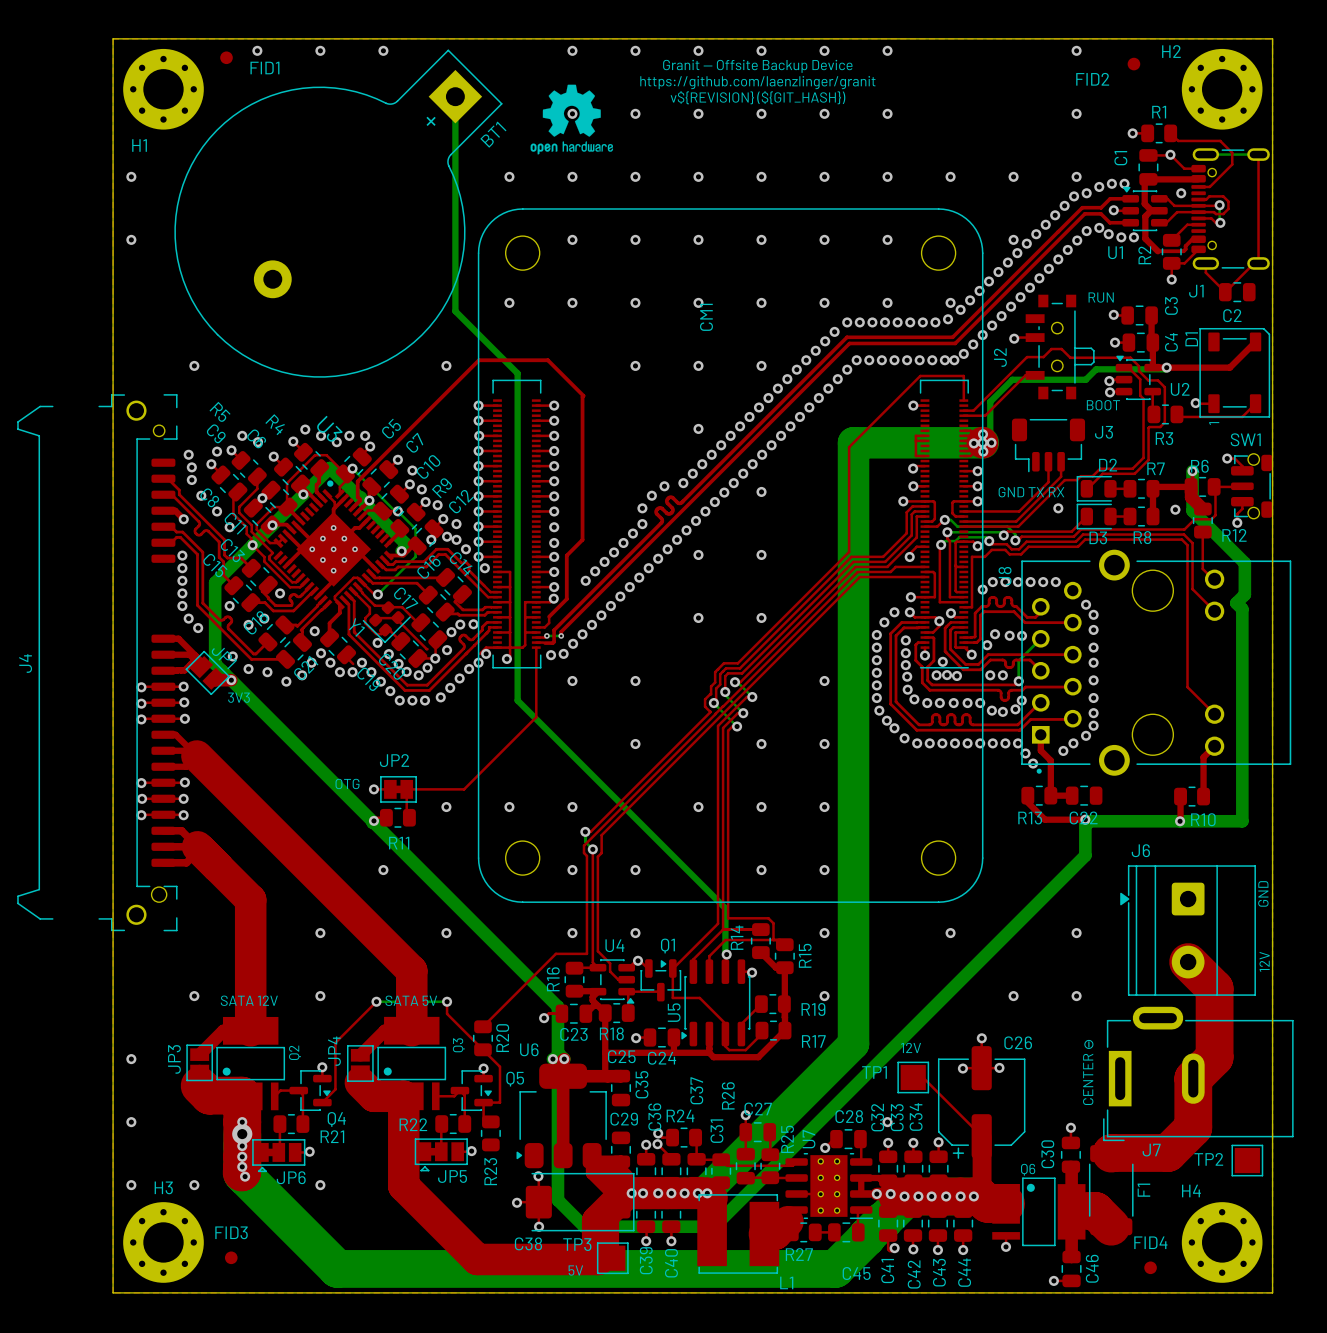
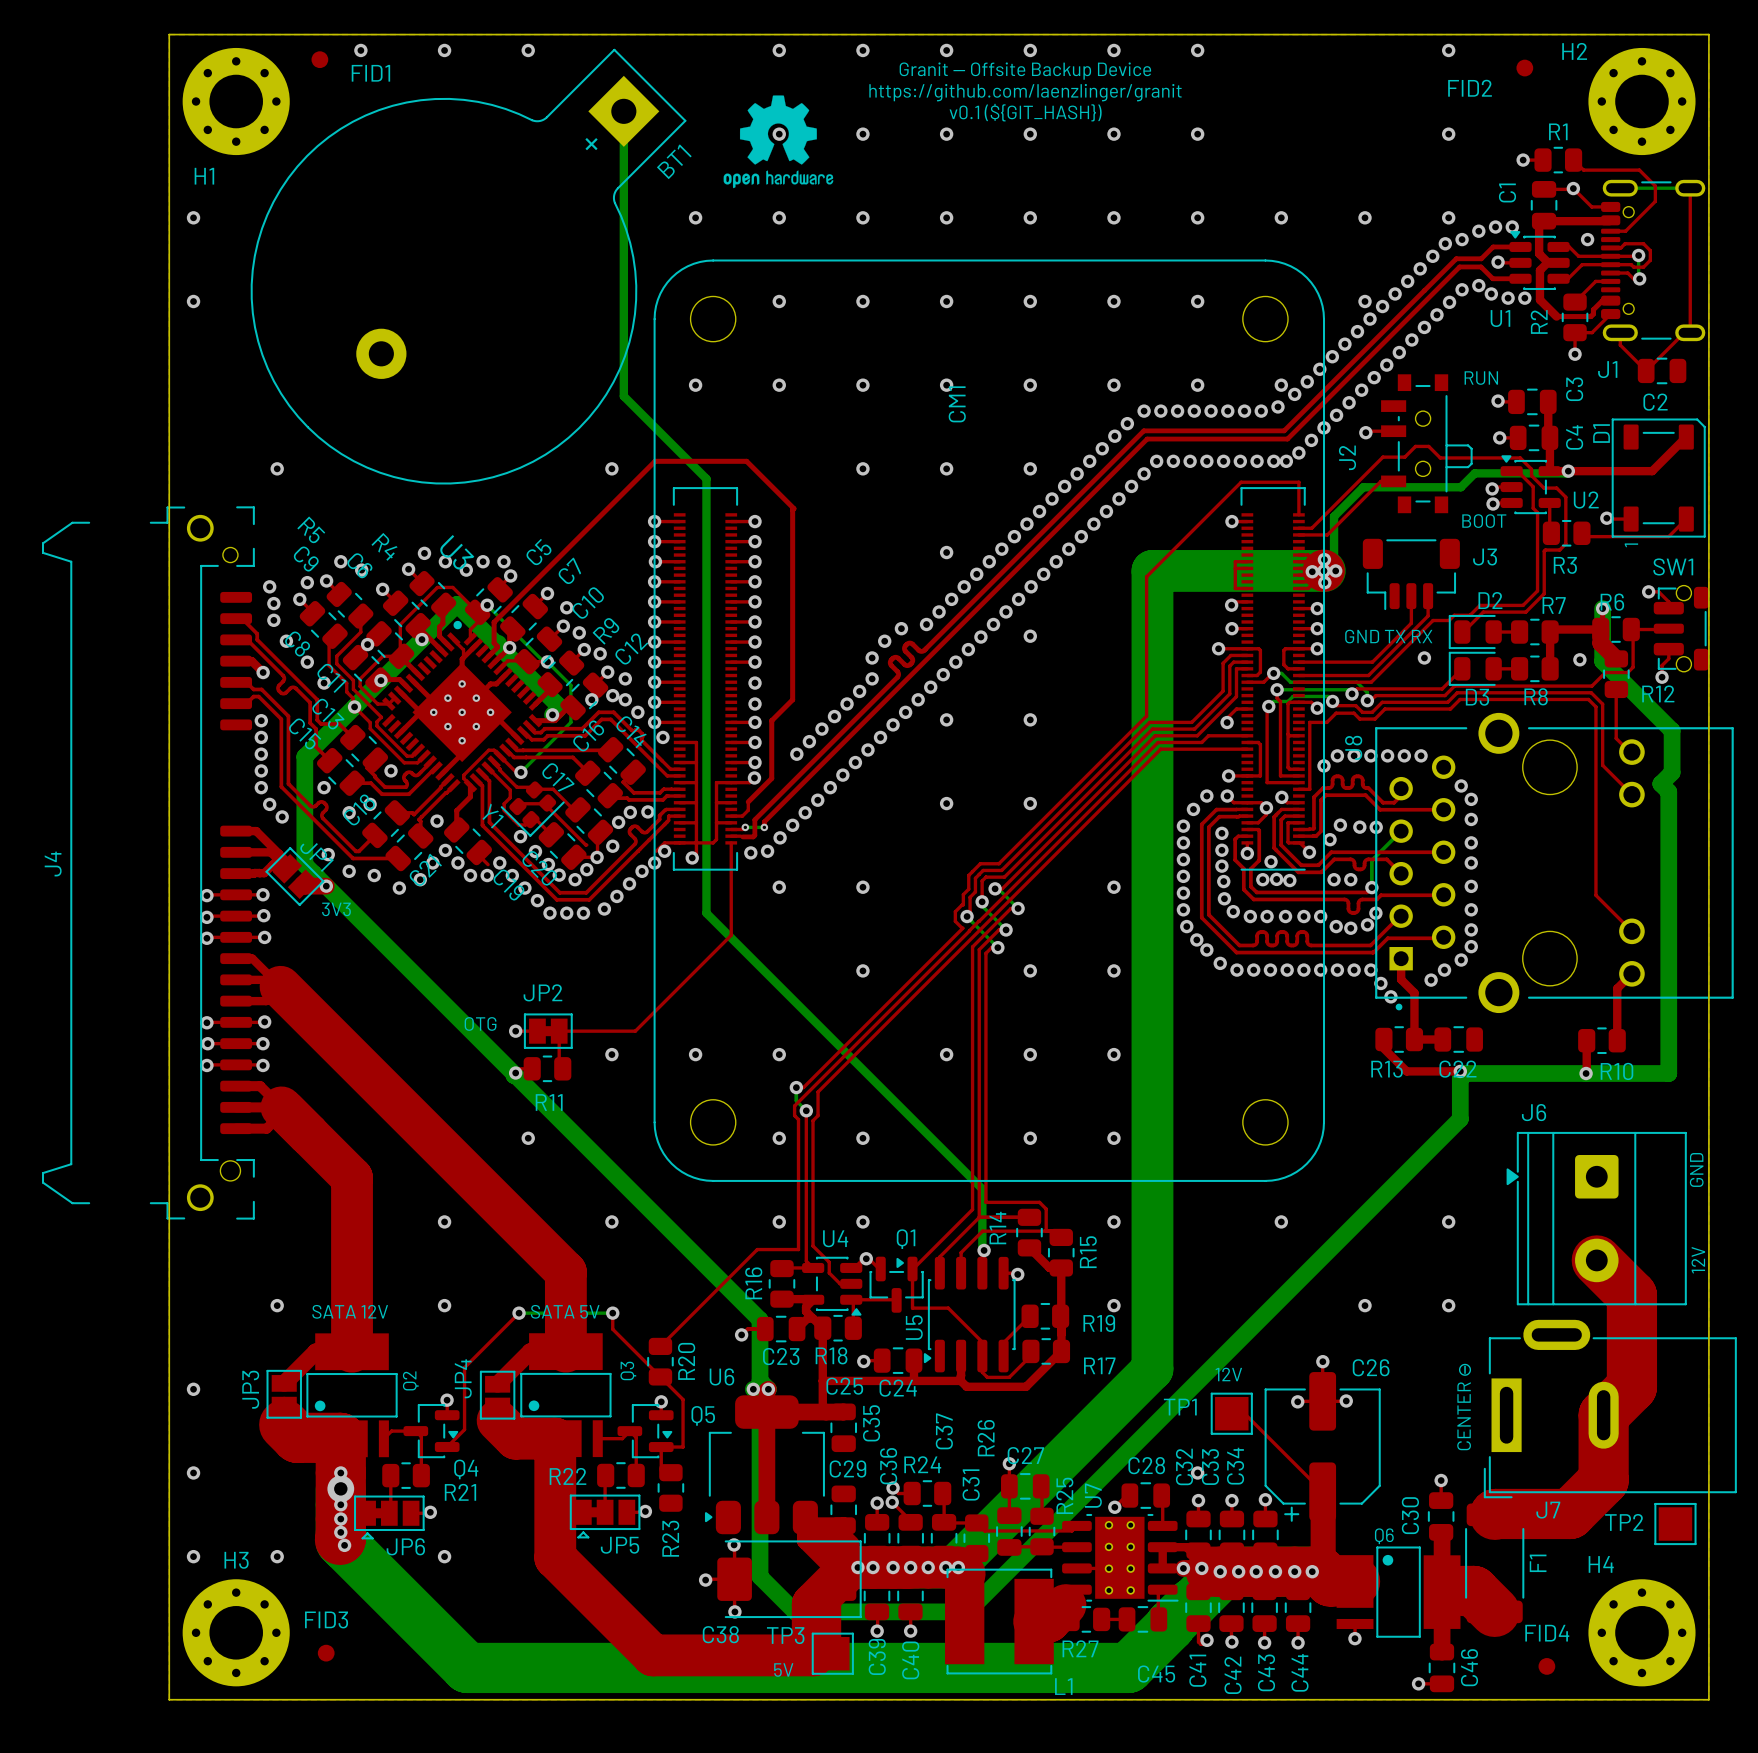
text: v${REVISION} (${GIT_HASH}) (757, 97) -> v0.1 (${GIT_HASH}) (1025, 112)

